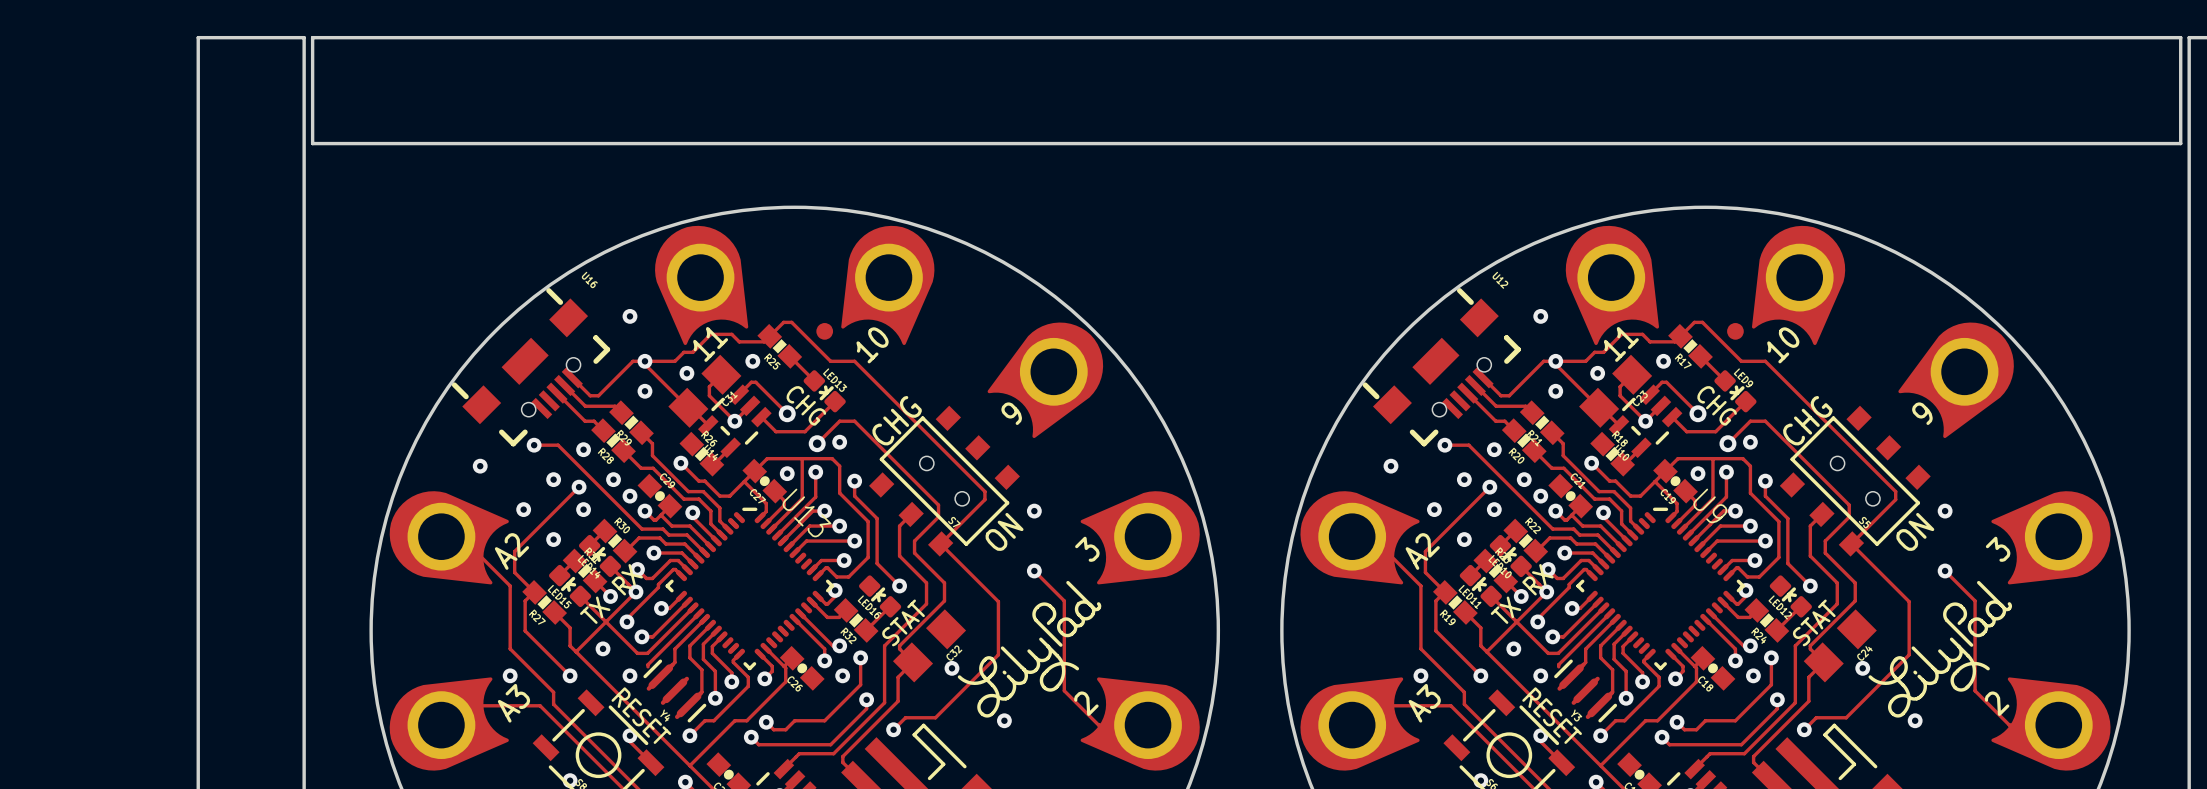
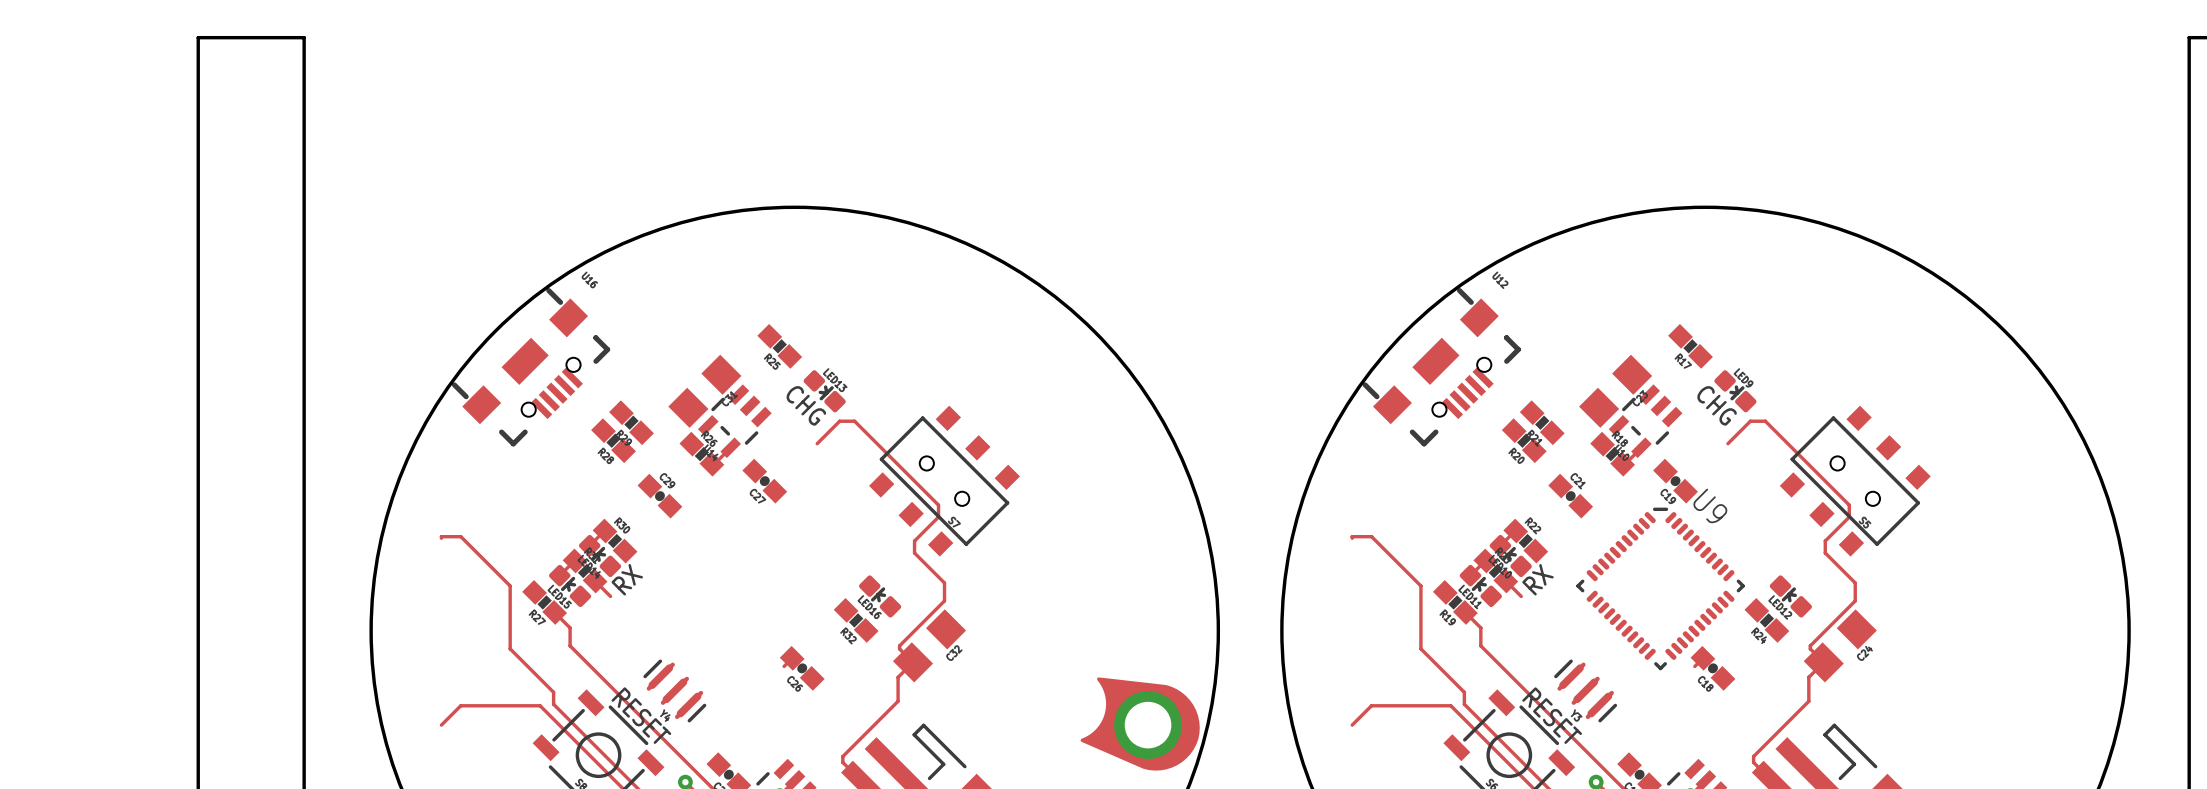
board edge: (312, 37) (312, 143) (2180, 143) (2180, 37) (312, 37) -> none
part: (701, 285) -> none
part: (887, 285) -> none
part: (1612, 285) -> none
part: (1798, 285) -> none
via: (629, 316) -> none
via: (1540, 316) -> none
part: (824, 331) -> none
part: (1735, 331) -> none
text: 11 (710, 344) -> none
text: 11 (1621, 344) -> none
text: 10 (872, 345) -> none
text: 10 (1783, 345) -> none
track: (789, 356) (814, 380) -> none
track: (1700, 356) (1725, 380) -> none
track: (644, 361) (644, 364) (708, 425) -> none
via: (644, 361) -> none
via: (752, 361) -> none
track: (1555, 361) (1555, 364) (1619, 425) -> none
via: (1555, 361) -> none
via: (1663, 361) -> none
via: (686, 373) -> none
via: (1597, 373) -> none
track: (721, 374) (709, 386) (709, 395) (734, 421) (750, 405) -> none
track: (1632, 374) (1620, 386) (1620, 395) (1645, 421) (1660, 405) -> none
track: (572, 377) (590, 395) (598, 395) (632, 361) (674, 361) (683, 352) (692, 352) (710, 334) (731, 334) (739, 341) (764, 341) (783, 322) (791, 322) (830, 361) (854, 361) (984, 491) (984, 499) (940, 543) (998, 601) (998, 654) (935, 717) (905, 717) (893, 729) -> none
track: (1483, 377) (1501, 395) (1509, 395) (1543, 361) (1585, 361) (1594, 352) (1603, 352) (1621, 334) (1642, 334) (1650, 341) (1674, 341) (1694, 322) (1702, 322) (1741, 361) (1765, 361) (1895, 491) (1895, 499) (1851, 543) (1909, 601) (1909, 654) (1846, 717) (1816, 717) (1804, 729) -> none
part: (1045, 380) -> none
part: (1956, 380) -> none
track: (564, 385) (585, 406) (615, 406) (621, 412) -> none
track: (1475, 385) (1496, 406) (1525, 406) (1532, 412) -> none
via: (644, 391) -> none
via: (1555, 391) -> none
track: (557, 393) (585, 421) (594, 421) (603, 430) -> none
track: (1467, 393) (1495, 421) (1504, 421) (1514, 430) -> none
track: (738, 394) (751, 382) (755, 382) (787, 413) -> none
track: (1649, 394) (1662, 382) (1666, 382) (1698, 413) -> none
track: (835, 401) (804, 431) (775, 431) (761, 417) -> none
track: (1745, 401) (1715, 431) (1686, 431) (1672, 417) -> none
via: (787, 413) -> none
text: 9 (1011, 413) -> none
via: (1698, 413) -> none
text: 9 (1922, 413) -> none
text: CHG (897, 420) -> none
text: CHG (1807, 420) -> none
via: (734, 421) -> none
via: (1645, 421) -> none
track: (641, 432) (652, 443) (652, 455) (688, 491) (703, 491) (719, 508) (719, 521) (727, 529) -> none
track: (1552, 432) (1563, 443) (1563, 455) (1599, 491) (1614, 491) (1630, 508) (1630, 521) (1638, 529) -> none
via: (839, 442) -> none
via: (1750, 442) -> none
via: (817, 443) -> none
via: (1727, 443) -> none
track: (534, 445) (558, 445) (641, 529) (662, 529) (668, 535) (687, 535) (704, 552) -> none
via: (534, 445) -> none
track: (1444, 445) (1468, 445) (1552, 529) (1573, 529) (1579, 535) (1597, 535) (1615, 552) -> none
via: (1444, 445) -> none
via: (583, 449) -> none
via: (1494, 449) -> none
track: (623, 450) (641, 468) (653, 468) (683, 499) (698, 499) (710, 511) (710, 523) (722, 535) -> none
track: (1534, 450) (1551, 468) (1563, 468) (1594, 499) (1609, 499) (1621, 511) (1621, 523) (1632, 535) -> none
track: (802, 458) (802, 498) (771, 529) -> none
track: (1712, 458) (1712, 498) (1682, 529) -> none
track: (680, 463) (698, 481) (704, 481) (719, 496) (729, 496) (767, 458) (832, 458) (839, 466) (839, 493) (868, 521) (868, 557) (848, 576) (836, 576) (827, 568) (818, 575) -> none
via: (680, 463) -> none
track: (1591, 463) (1609, 481) (1615, 481) (1630, 496) (1640, 496) (1677, 458) (1742, 458) (1750, 466) (1750, 493) (1778, 521) (1778, 557) (1759, 576) (1747, 576) (1738, 568) (1728, 575) -> none
via: (1591, 463) -> none
via: (480, 466) -> none
via: (1390, 466) -> none
track: (815, 472) (815, 496) (777, 535) -> none
via: (815, 472) -> none
track: (1726, 472) (1726, 496) (1688, 535) -> none
via: (1726, 472) -> none
via: (787, 473) -> none
via: (1698, 473) -> none
via: (553, 479) -> none
via: (613, 479) -> none
via: (1464, 479) -> none
via: (1524, 479) -> none
track: (744, 481) (766, 503) (766, 511) (760, 517) -> none
track: (854, 481) (854, 496) (877, 518) (877, 563) (899, 585) -> none
via: (854, 481) -> none
track: (1655, 481) (1677, 503) (1677, 511) (1670, 517) -> none
track: (1765, 481) (1765, 496) (1787, 518) (1787, 563) (1810, 585) -> none
via: (1765, 481) -> none
track: (579, 487) (514, 551) (514, 572) (534, 592) (525, 600) (525, 630) (570, 675) -> none
via: (579, 487) -> none
track: (1489, 487) (1425, 551) (1425, 572) (1445, 592) (1435, 600) (1435, 630) (1480, 675) -> none
via: (1489, 487) -> none
track: (774, 491) (784, 500) (784, 505) (766, 523) -> none
track: (1685, 491) (1695, 500) (1695, 505) (1676, 523) -> none
via: (629, 496) -> none
via: (1540, 496) -> none
track: (669, 506) (656, 520) (644, 511) -> none
track: (1580, 506) (1566, 520) (1555, 511) -> none
via: (523, 509) -> none
via: (583, 509) -> none
via: (1434, 509) -> none
via: (1494, 509) -> none
via: (644, 511) -> none
track: (824, 511) (812, 511) (783, 540) -> none
via: (824, 511) -> none
via: (1034, 511) -> none
via: (1555, 511) -> none
track: (1735, 511) (1723, 511) (1694, 540) -> none
via: (1735, 511) -> none
via: (1945, 511) -> none
track: (692, 512) (692, 517) (716, 540) -> none
via: (692, 512) -> none
track: (1603, 512) (1603, 517) (1627, 540) -> none
via: (1603, 512) -> none
track: (911, 514) (899, 526) (899, 556) (926, 582) (926, 603) (884, 645) (884, 702) (833, 753) (799, 753) (783, 769) -> none
track: (1821, 514) (1810, 526) (1810, 556) (1837, 582) (1837, 603) (1795, 645) (1795, 702) (1744, 753) (1710, 753) (1694, 769) -> none
track: (660, 515) (671, 526) (689, 526) (710, 546) -> none
track: (1571, 515) (1582, 526) (1600, 526) (1621, 546) -> none
track: (839, 526) (809, 526) (789, 546) -> none
via: (839, 526) -> none
track: (1750, 526) (1720, 526) (1699, 546) -> none
via: (1750, 526) -> none
text: ON (1004, 531) -> none
text: ON (1915, 531) -> none
part: (449, 537) -> none
part: (1140, 537) -> none
part: (1360, 537) -> none
part: (2050, 537) -> none
via: (553, 539) -> none
via: (1464, 539) -> none
track: (854, 541) (806, 541) (795, 552) -> none
via: (854, 541) -> none
track: (1765, 541) (1717, 541) (1705, 552) -> none
via: (1765, 541) -> none
text: 3 (1087, 549) -> none
text: 3 (1998, 549) -> none
text: A2 (511, 551) -> none
track: (625, 551) (638, 538) (659, 538) (665, 544) (684, 544) (698, 558) -> none
text: A2 (1422, 551) -> none
track: (1535, 551) (1549, 538) (1570, 538) (1576, 544) (1595, 544) (1609, 558) -> none
track: (653, 553) (681, 553) (693, 564) -> none
via: (653, 553) -> none
track: (1564, 553) (1592, 553) (1603, 564) -> none
via: (1564, 553) -> none
track: (844, 560) (821, 560) (812, 569) -> none
via: (844, 560) -> none
track: (1754, 560) (1732, 560) (1722, 569) -> none
via: (1754, 560) -> none
track: (610, 566) (635, 591) (576, 651) -> none
track: (1521, 566) (1546, 591) (1486, 651) -> none
track: (637, 569) (646, 578) (652, 578) (670, 560) (678, 560) (687, 569) -> none
via: (637, 569) -> none
track: (1548, 569) (1557, 578) (1563, 578) (1581, 560) (1588, 560) (1598, 569) -> none
via: (1548, 569) -> none
track: (1034, 570) (1064, 600) (1064, 690) (1098, 725) (1148, 725) -> none
via: (1034, 570) -> none
track: (1945, 570) (1975, 600) (1975, 690) (2009, 725) (2058, 725) -> none
via: (1945, 570) -> none
track: (681, 575) (673, 569) (627, 618) (627, 621) -> none
track: (1592, 575) (1584, 569) (1537, 618) (1537, 621) -> none
drawing: [957, 580, 1102, 718] -> none
drawing: [1868, 580, 2013, 718] -> none
via: (899, 585) -> none
via: (1810, 585) -> none
U13: (749, 588) -> none
track: (835, 590) (835, 596) (827, 603) (818, 596) -> none
via: (835, 590) -> none
track: (1745, 590) (1745, 596) (1738, 603) (1728, 596) -> none
via: (1745, 590) -> none
via: (635, 591) -> none
via: (1546, 591) -> none
track: (580, 596) (637, 653) (647, 653) (693, 607) -> none
via: (610, 596) -> none
track: (681, 596) (669, 608) (661, 608) -> none
track: (1491, 596) (1548, 653) (1558, 653) (1603, 607) -> none
via: (1521, 596) -> none
track: (1592, 596) (1580, 608) (1572, 608) -> none
track: (687, 602) (652, 636) (641, 636) -> none
track: (812, 602) (827, 617) (839, 617) (846, 610) -> none
track: (1598, 602) (1563, 636) (1552, 636) -> none
track: (1722, 602) (1738, 617) (1749, 617) (1756, 610) -> none
track: (890, 606) (866, 630) -> none
track: (1801, 606) (1776, 630) -> none
via: (661, 608) -> none
via: (1572, 608) -> none
text: TX (595, 610) -> none
text: TX (1505, 610) -> none
track: (698, 613) (647, 666) -> none
track: (800, 613) (832, 645) (839, 645) -> none
track: (1609, 613) (1558, 666) -> none
track: (1711, 613) (1743, 645) (1750, 645) -> none
track: (704, 619) (674, 649) (674, 662) (660, 676) -> none
track: (795, 619) (824, 649) (824, 660) -> none
track: (1615, 619) (1585, 649) (1585, 662) (1571, 676) -> none
track: (1705, 619) (1735, 649) (1735, 660) -> none
via: (627, 621) -> none
via: (1537, 621) -> none
text: STAT (903, 622) -> none
text: STAT (1814, 622) -> none
track: (710, 625) (689, 645) (689, 657) (701, 669) (701, 692) (689, 704) -> none
track: (1621, 625) (1600, 645) (1600, 657) (1612, 669) (1612, 692) (1599, 704) -> none
track: (716, 631) (703, 644) (703, 659) (715, 671) (715, 698) -> none
track: (1627, 631) (1614, 644) (1614, 659) (1626, 671) (1626, 698) -> none
via: (641, 636) -> none
track: (722, 636) (712, 646) (712, 653) (731, 672) (731, 681) -> none
via: (1552, 636) -> none
track: (1632, 636) (1623, 646) (1623, 653) (1642, 672) (1642, 681) -> none
via: (839, 645) -> none
via: (1750, 645) -> none
via: (603, 648) -> none
track: (766, 648) (785, 668) (785, 681) (746, 720) (734, 720) (689, 765) -> none
via: (1513, 648) -> none
track: (1676, 648) (1696, 668) (1696, 681) (1657, 720) (1645, 720) (1600, 765) -> none
track: (739, 654) (733, 662) (748, 677) (748, 686) (713, 720) (704, 720) (689, 735) -> none
track: (760, 654) (772, 666) (772, 671) (764, 678) -> none
track: (1650, 654) (1644, 662) (1659, 677) (1659, 686) (1624, 720) (1615, 720) (1600, 735) -> none
track: (1670, 654) (1683, 666) (1683, 671) (1675, 678) -> none
track: (860, 657) (860, 684) (824, 720) (794, 720) (785, 729) (773, 729) (766, 722) -> none
via: (860, 657) -> none
track: (1771, 657) (1771, 684) (1735, 720) (1705, 720) (1696, 729) (1684, 729) (1677, 722) -> none
via: (1771, 657) -> none
via: (824, 660) -> none
via: (1735, 660) -> none
via: (951, 668) -> none
via: (1862, 668) -> none
via: (510, 675) -> none
via: (570, 675) -> none
via: (629, 675) -> none
via: (842, 675) -> none
via: (1420, 675) -> none
via: (1480, 675) -> none
via: (1540, 675) -> none
via: (1753, 675) -> none
via: (764, 678) -> none
via: (1675, 678) -> none
via: (731, 681) -> none
via: (1642, 681) -> none
via: (715, 698) -> none
via: (1626, 698) -> none
track: (866, 699) (866, 708) (830, 744) (758, 744) (751, 737) -> none
via: (866, 699) -> none
track: (1777, 699) (1777, 708) (1741, 744) (1669, 744) (1662, 737) -> none
via: (1777, 699) -> none
text: A3 (513, 703) -> none
text: 2 (1086, 703) -> none
text: A3 (1424, 703) -> none
text: 2 (1997, 703) -> none
via: (1004, 720) -> none
via: (1915, 720) -> none
via: (766, 722) -> none
via: (1677, 722) -> none
part: (449, 724) -> none
part: (1360, 724) -> none
part: (2050, 724) -> none
via: (893, 729) -> none
via: (1804, 729) -> none
track: (629, 735) (629, 741) (650, 762) -> none
via: (629, 735) -> none
via: (689, 735) -> none
track: (1540, 735) (1540, 741) (1561, 762) -> none
via: (1540, 735) -> none
via: (1600, 735) -> none
via: (751, 737) -> none
via: (1662, 737) -> none
via: (570, 780) -> none
via: (1480, 780) -> none

